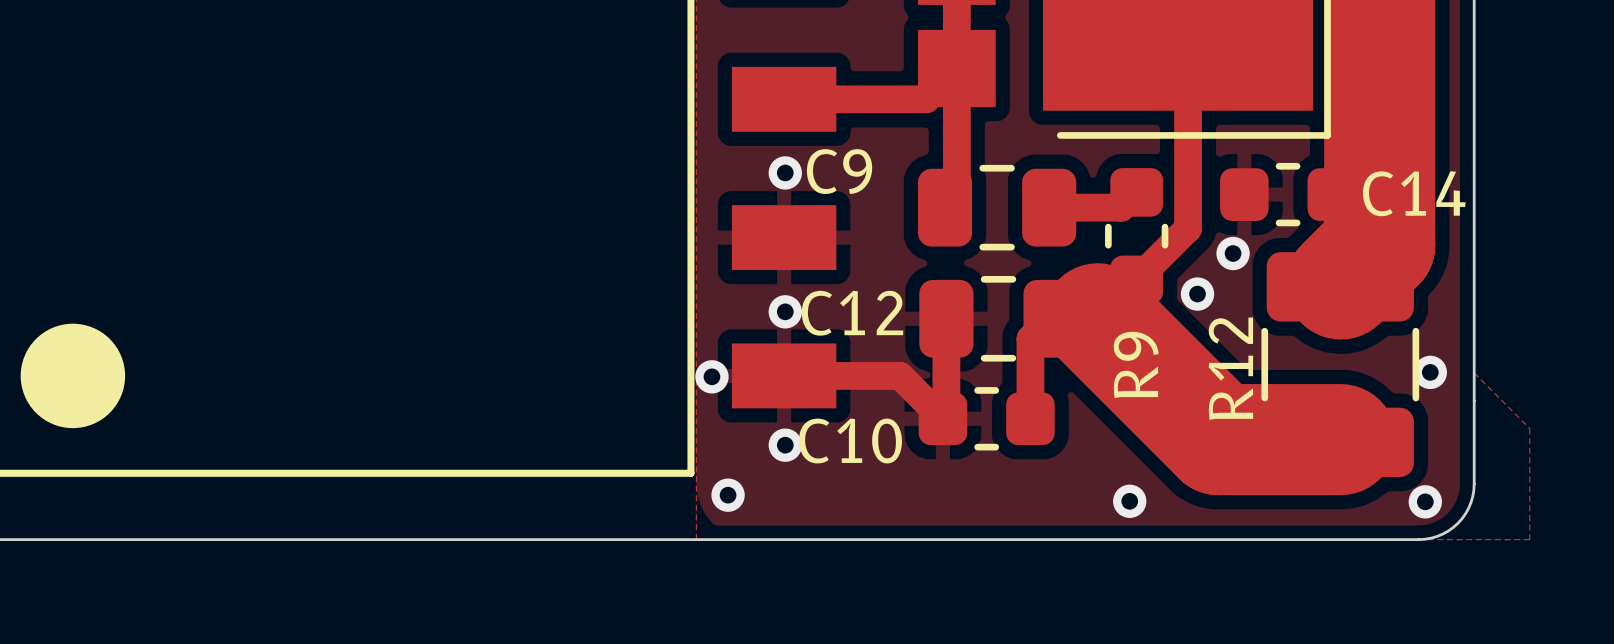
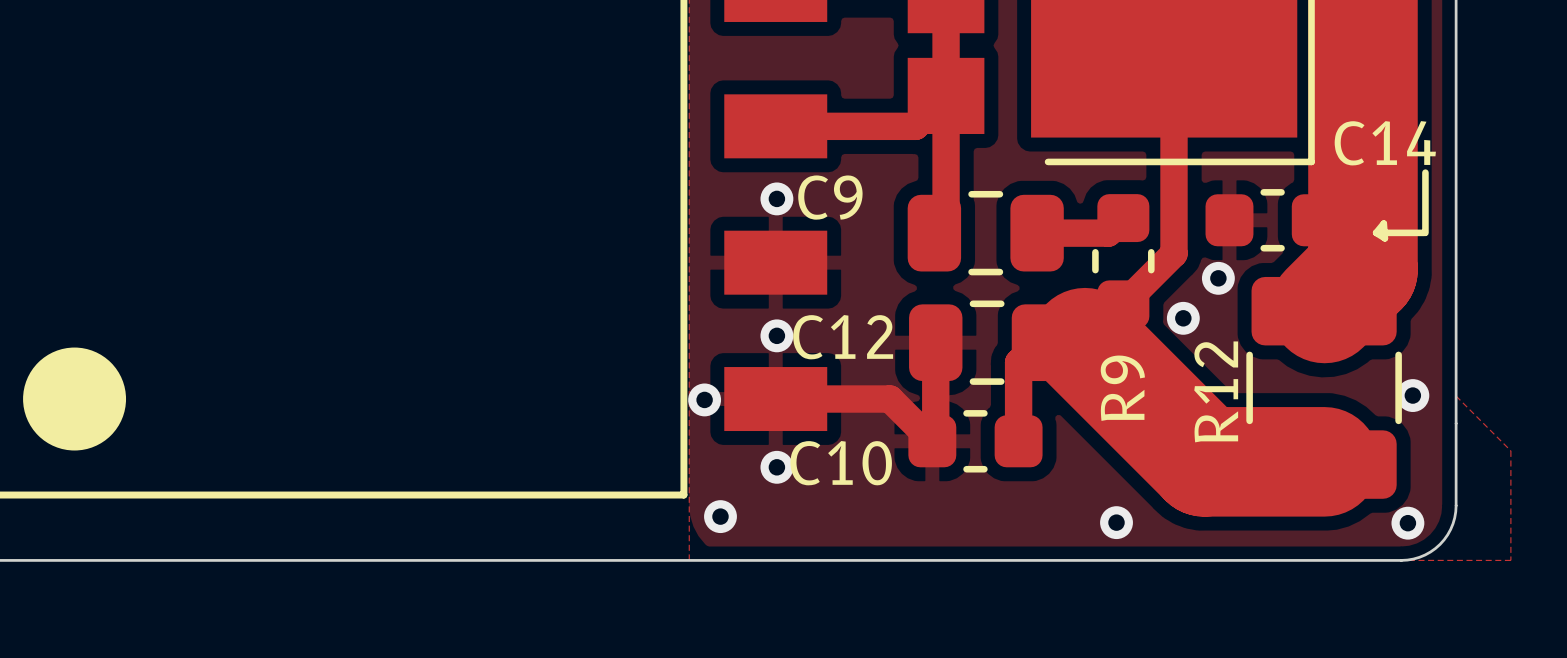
line: none -> (1425, 172) (1425, 232)
C14 name position: C14 (1414, 193) -> C14 (1385, 143)
line: none -> (1376, 232) (1424, 232)
line: none -> (1376, 232) (1384, 238) (1383, 223) (1376, 232)

